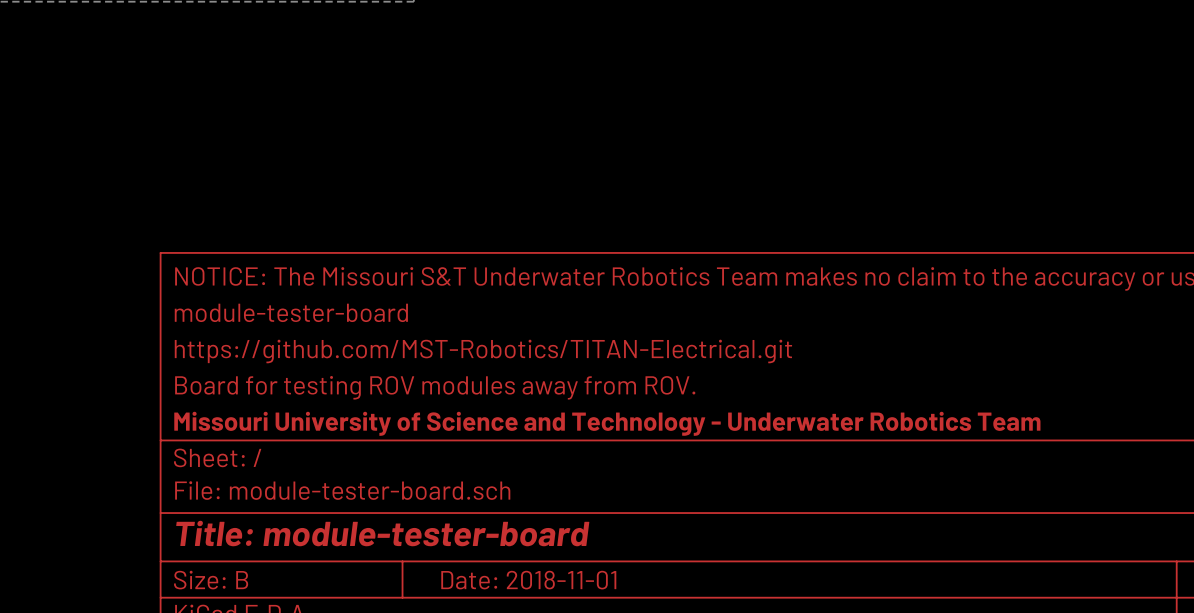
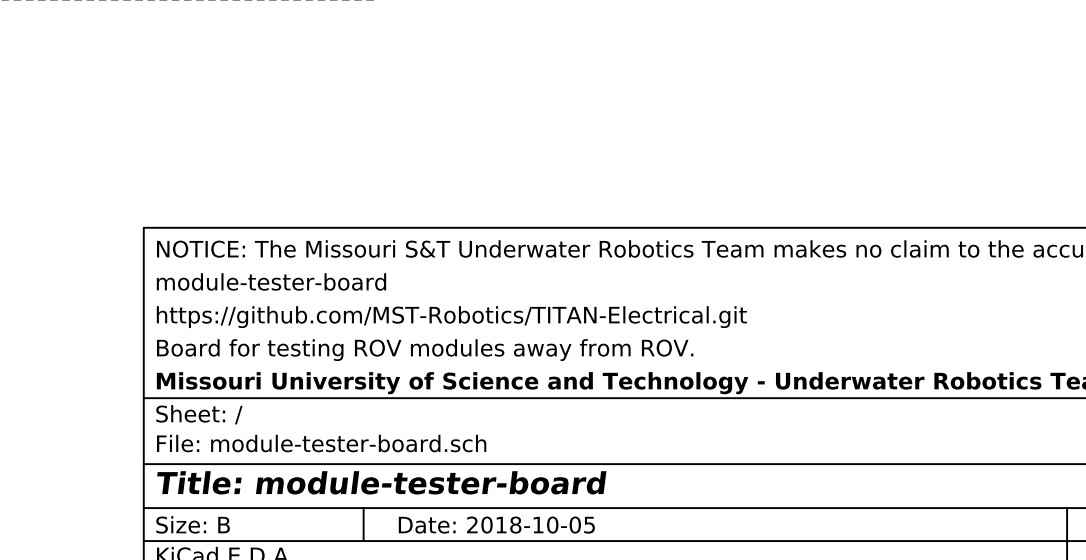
title block: Date: 2018-11-01 (528, 580) -> Date: 2018-10-05 (496, 525)

